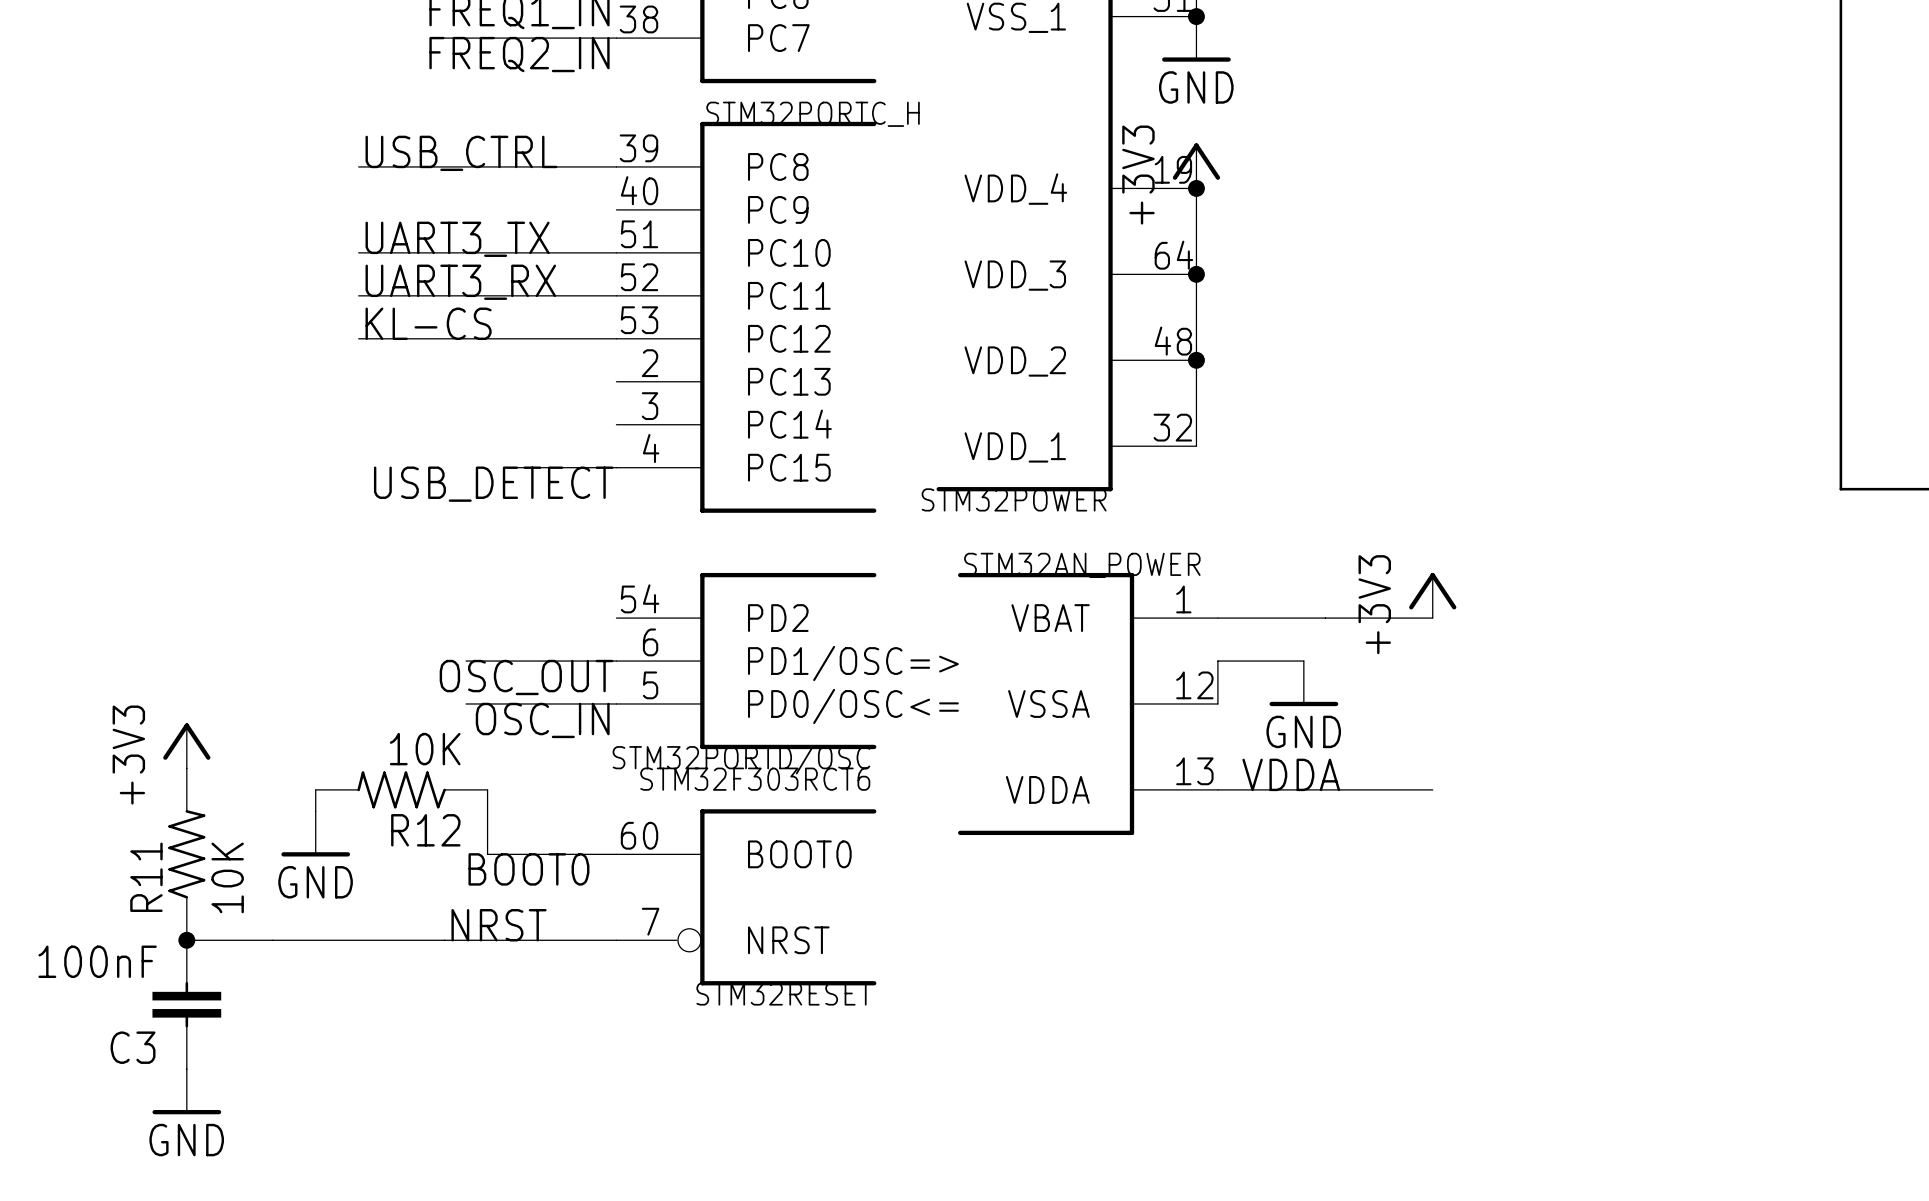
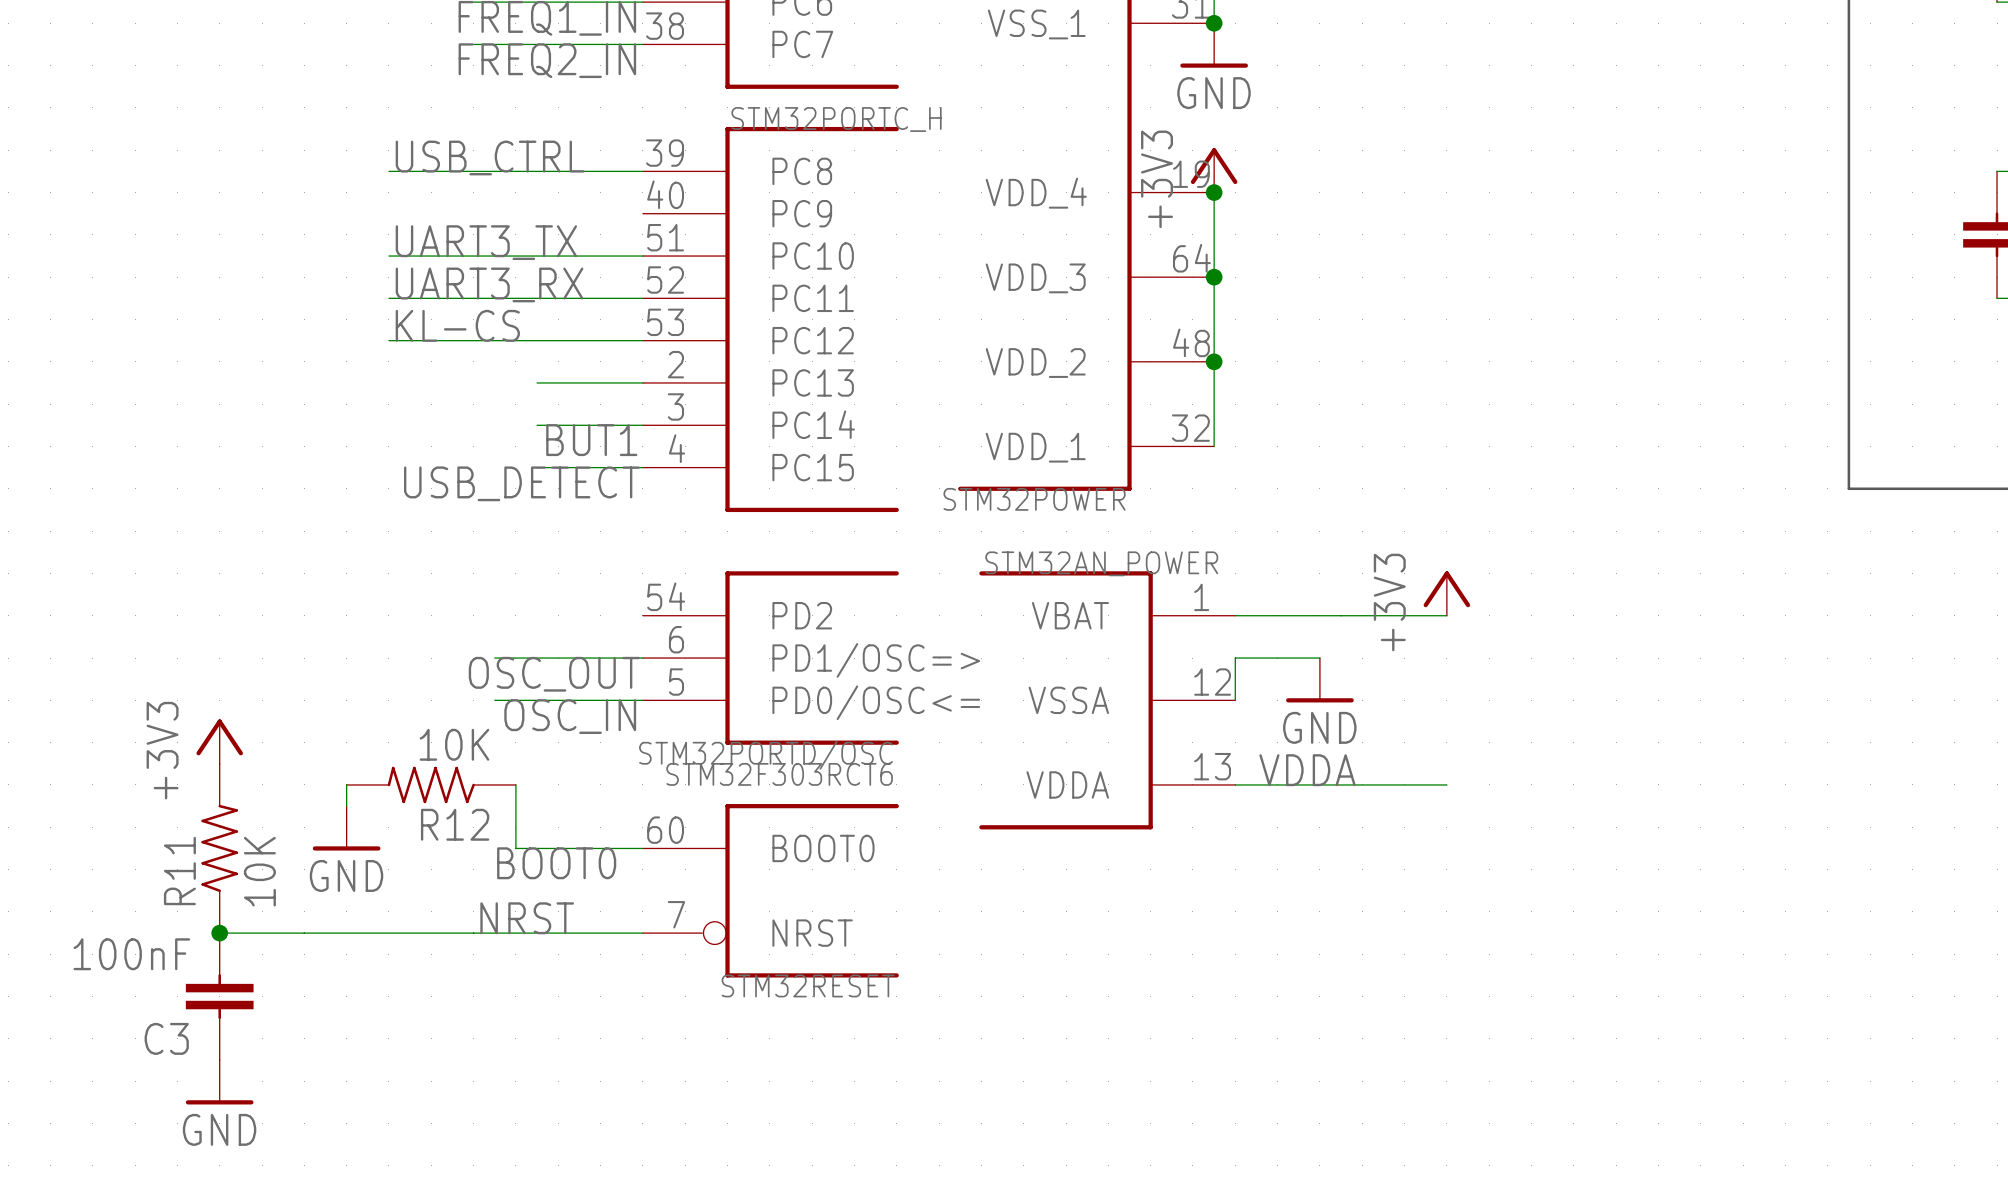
wire: none -> (537, 382) (642, 382)
wire: none -> (537, 425) (642, 425)
label: none -> BUT1 (591, 440)

